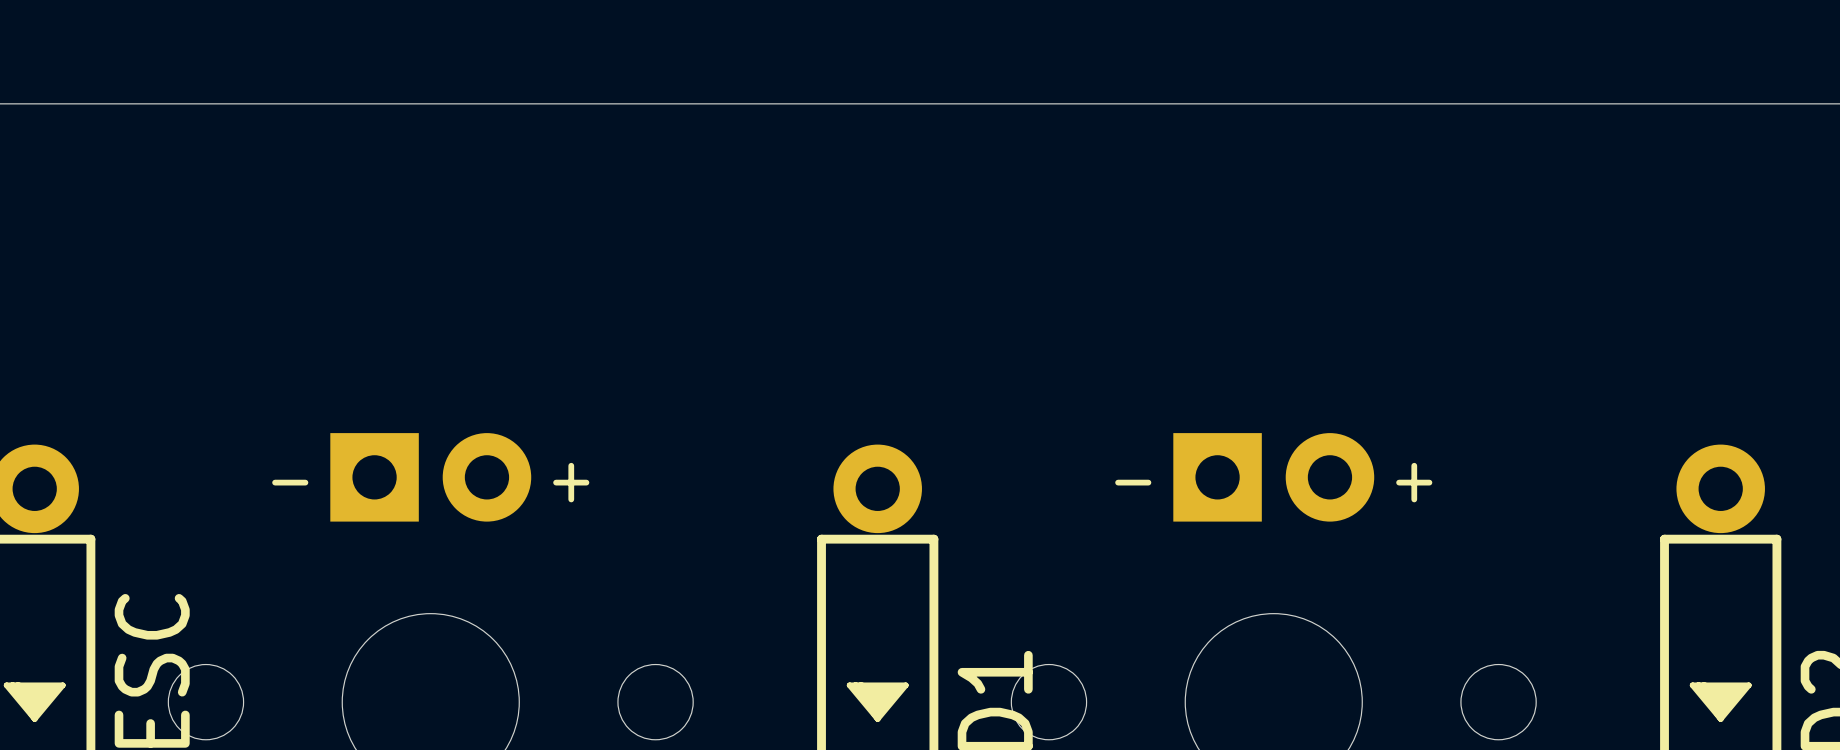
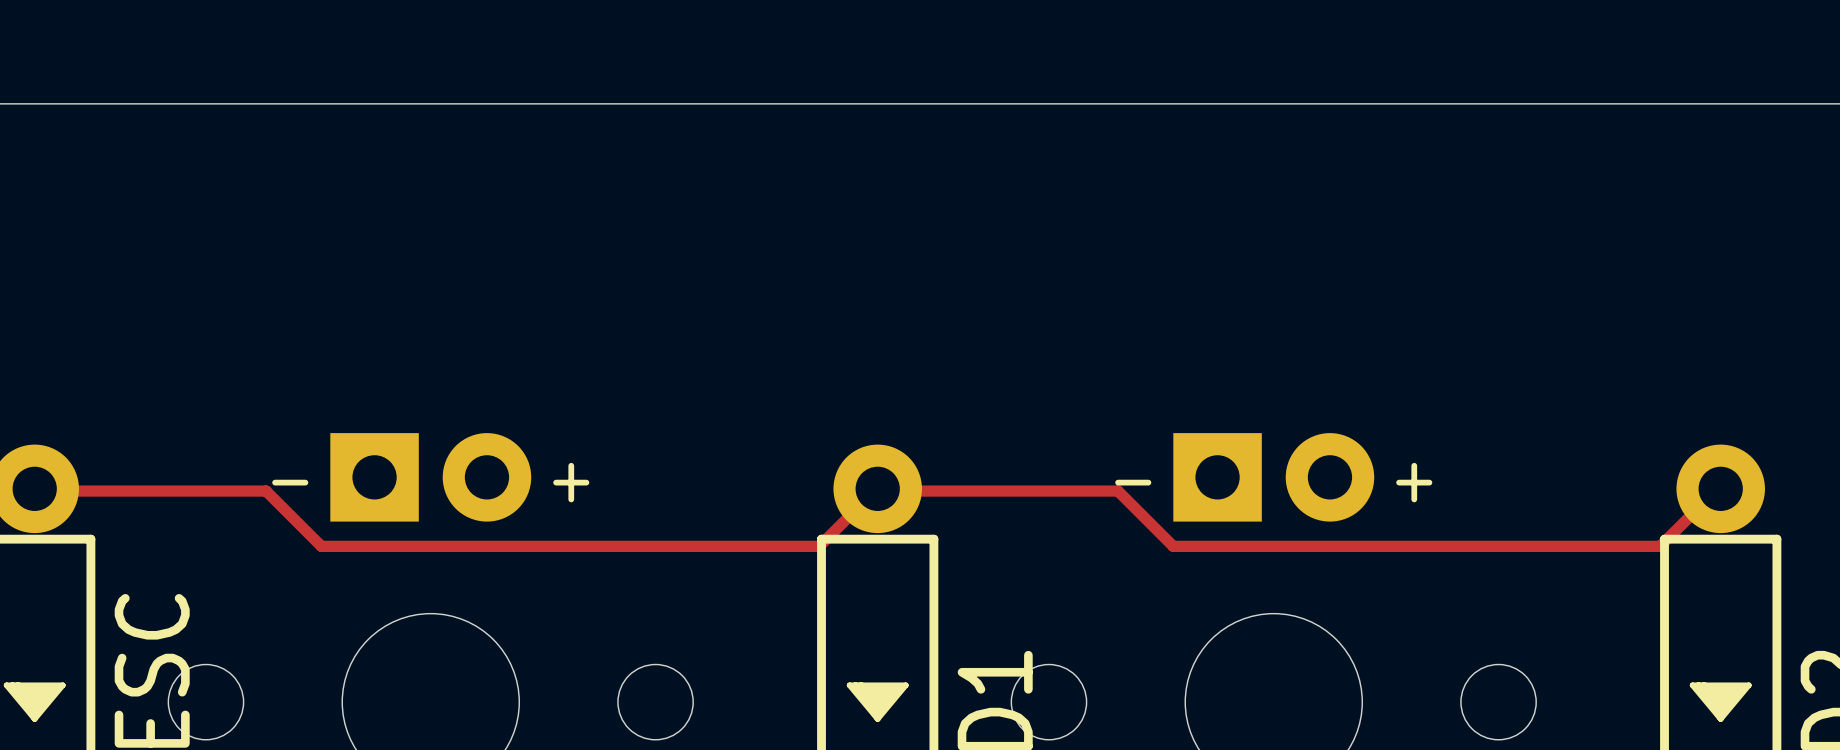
track: none -> (34, 488) (44, 491) (266, 491) (321, 546) (819, 546) (877, 488) (885, 491) (1118, 491) (1173, 546) (1660, 546) (1715, 491) (1720, 488)

